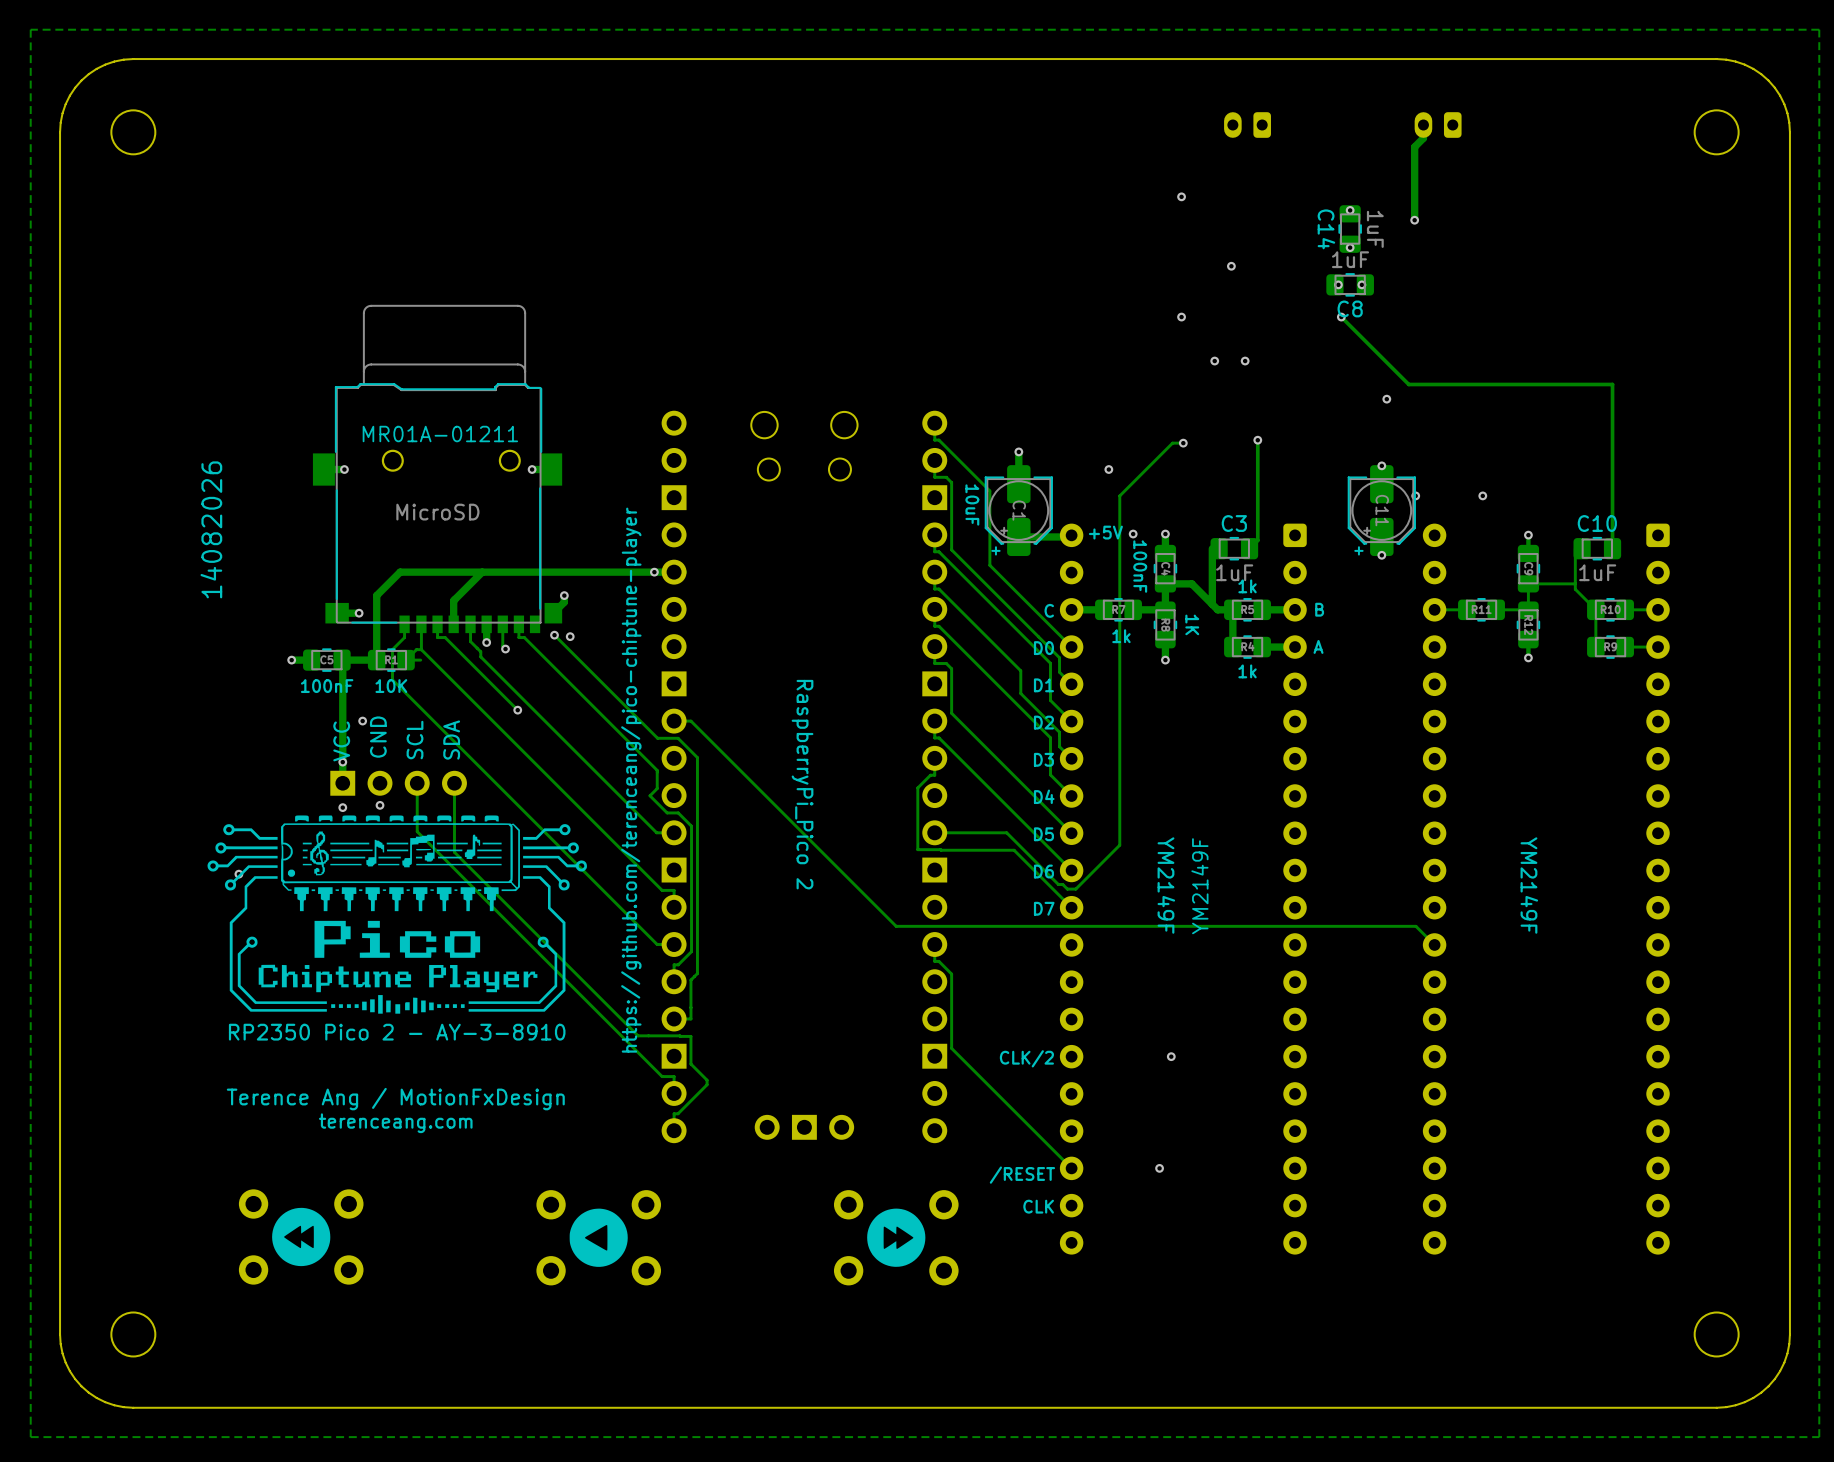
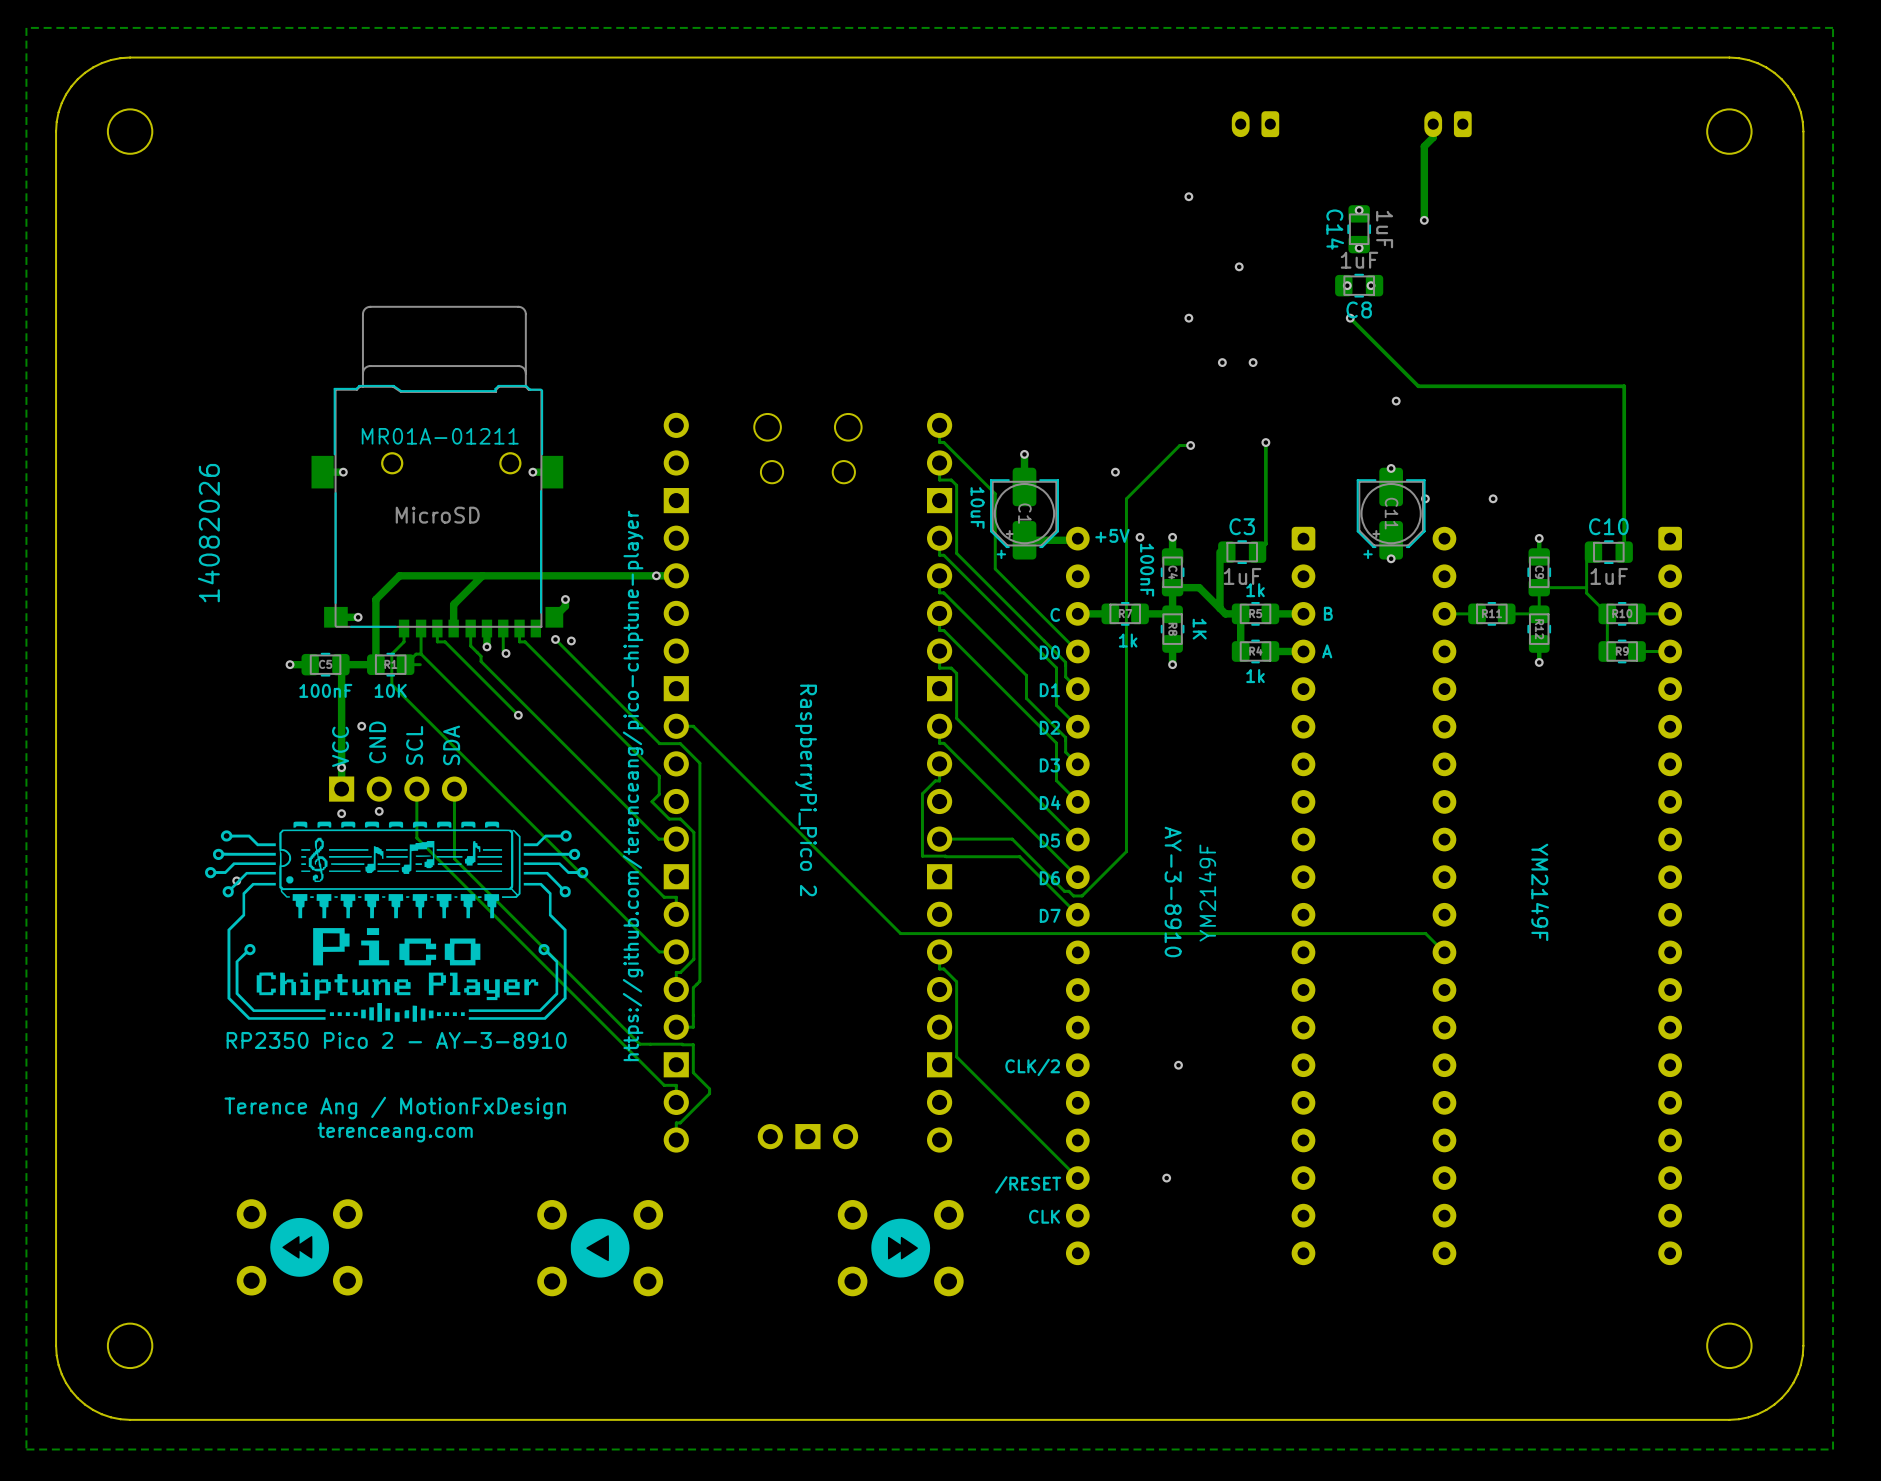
part value: YM2149F (1166, 885) -> AY-3-8910 (1173, 892)

